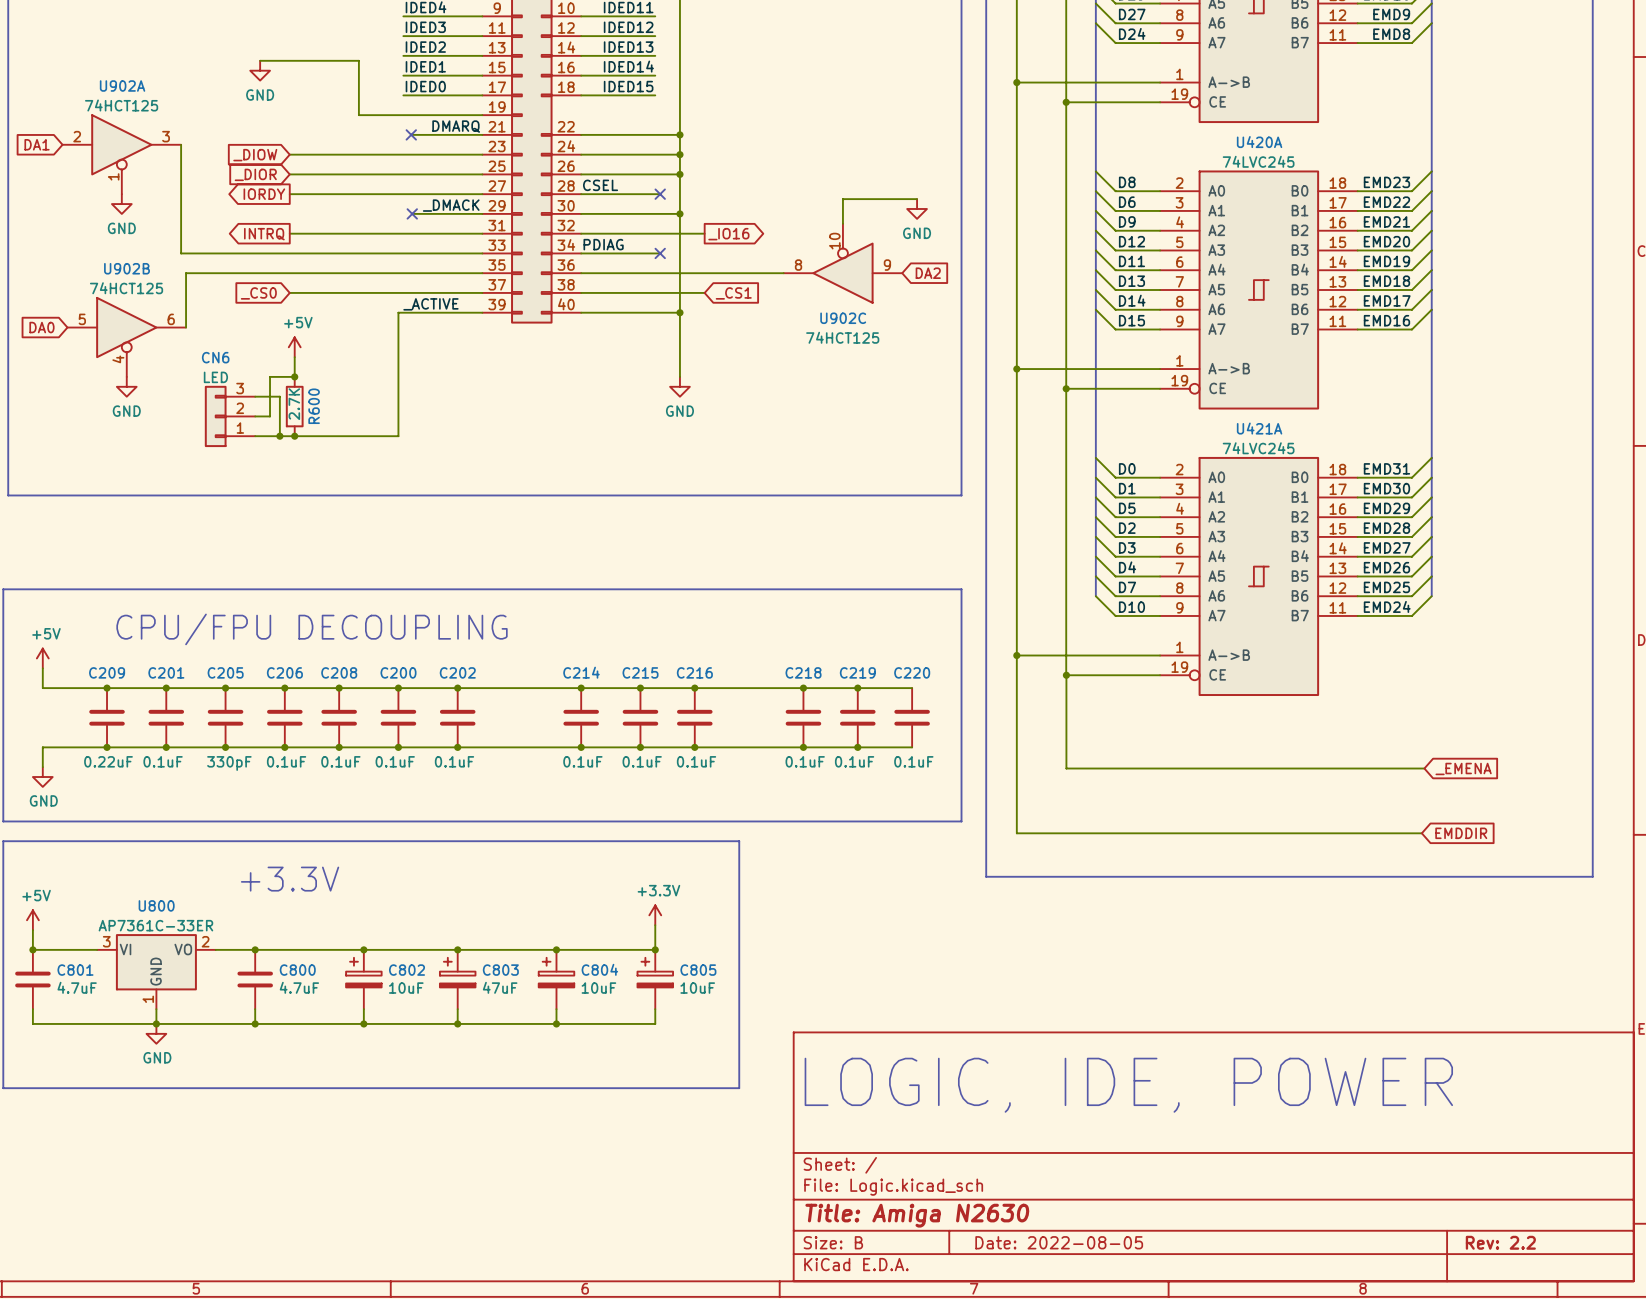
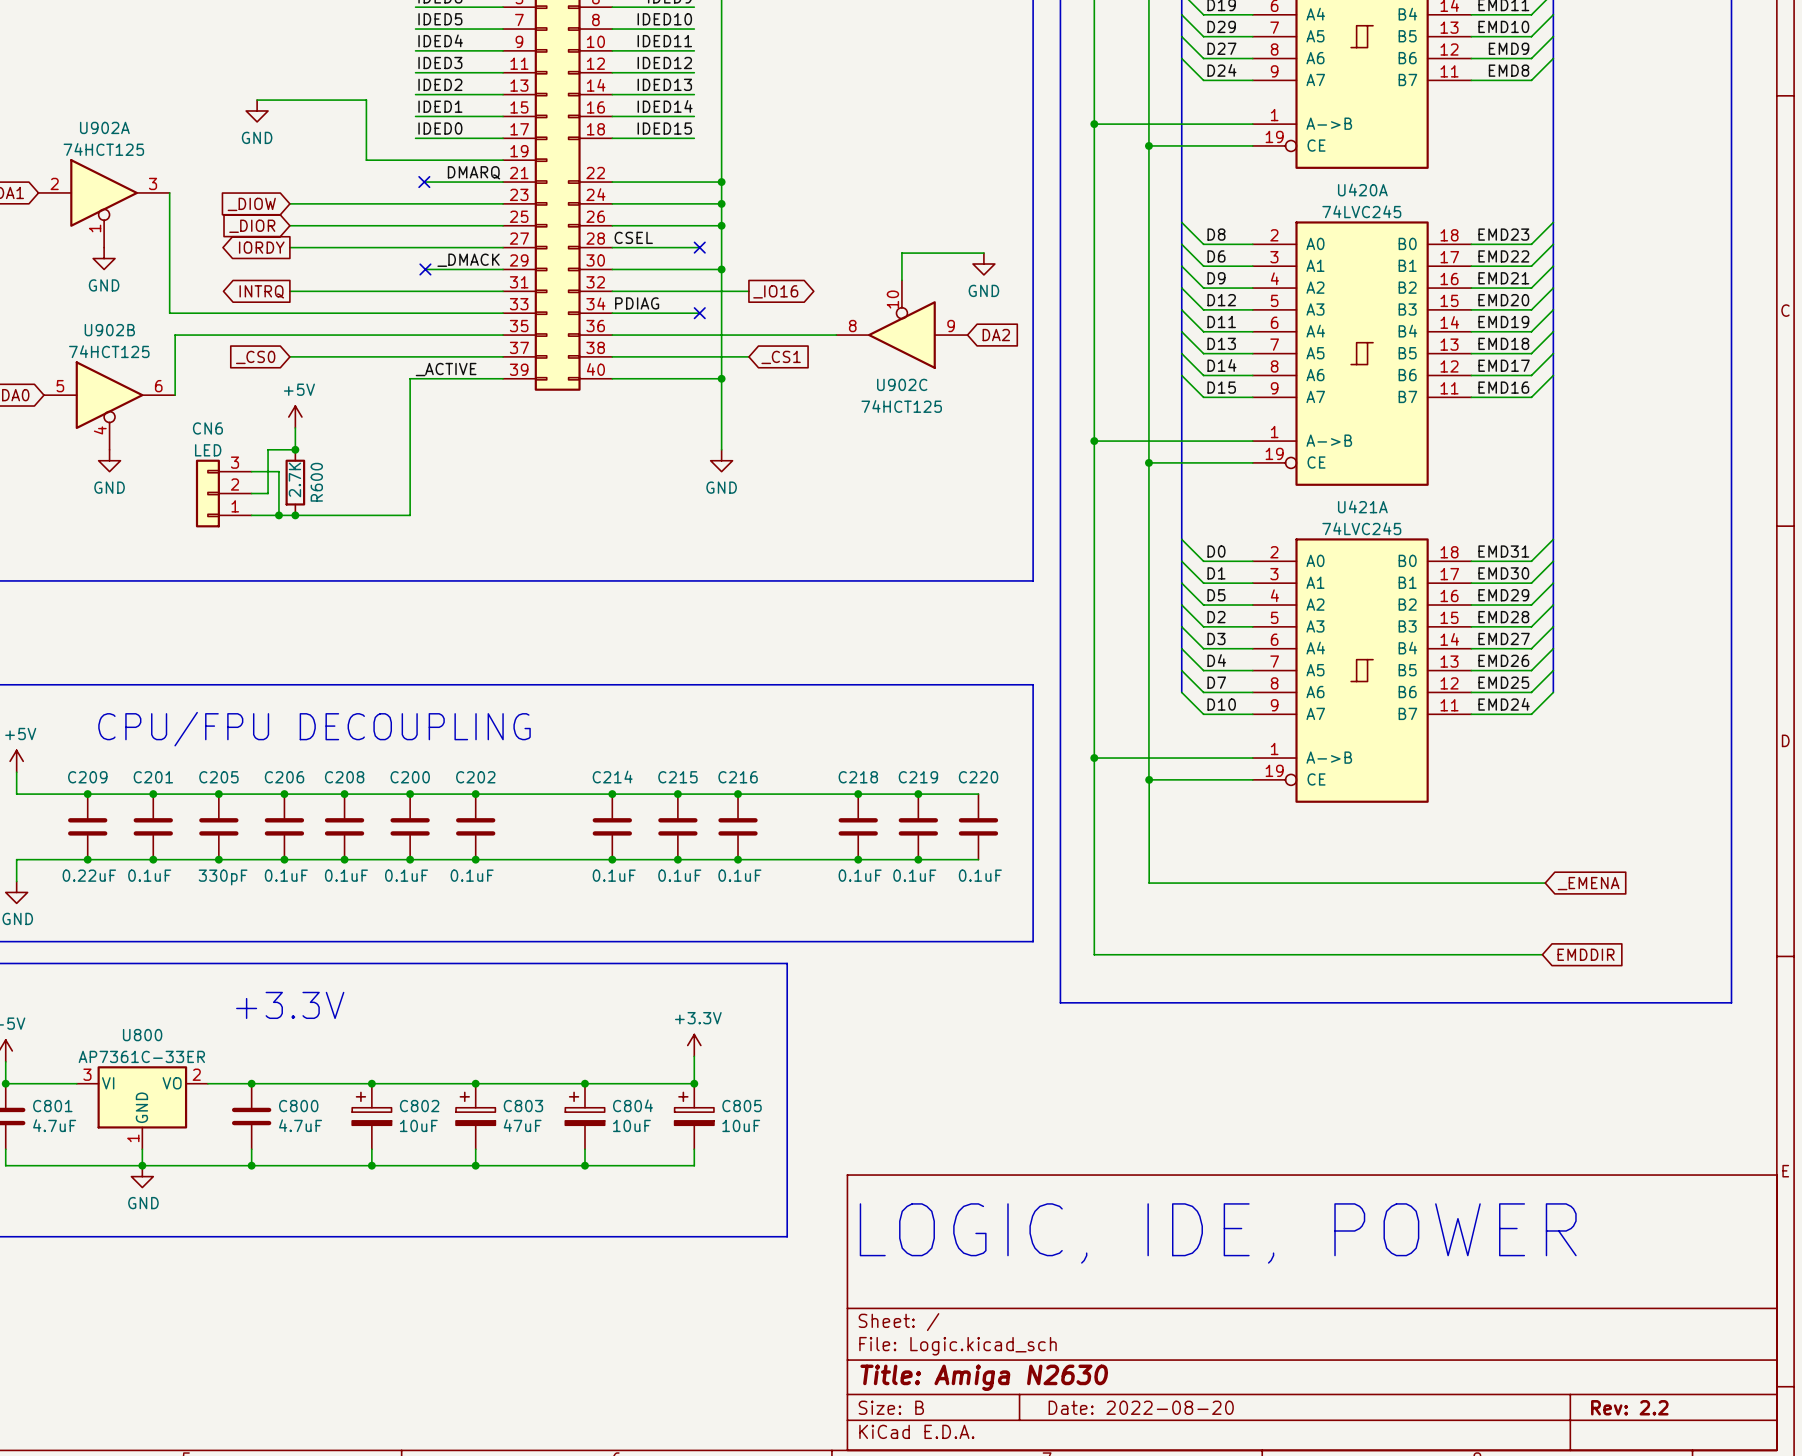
title block: Date: 2022-08-05 (1059, 1242) -> Date: 2022-08-20 (1141, 1407)

